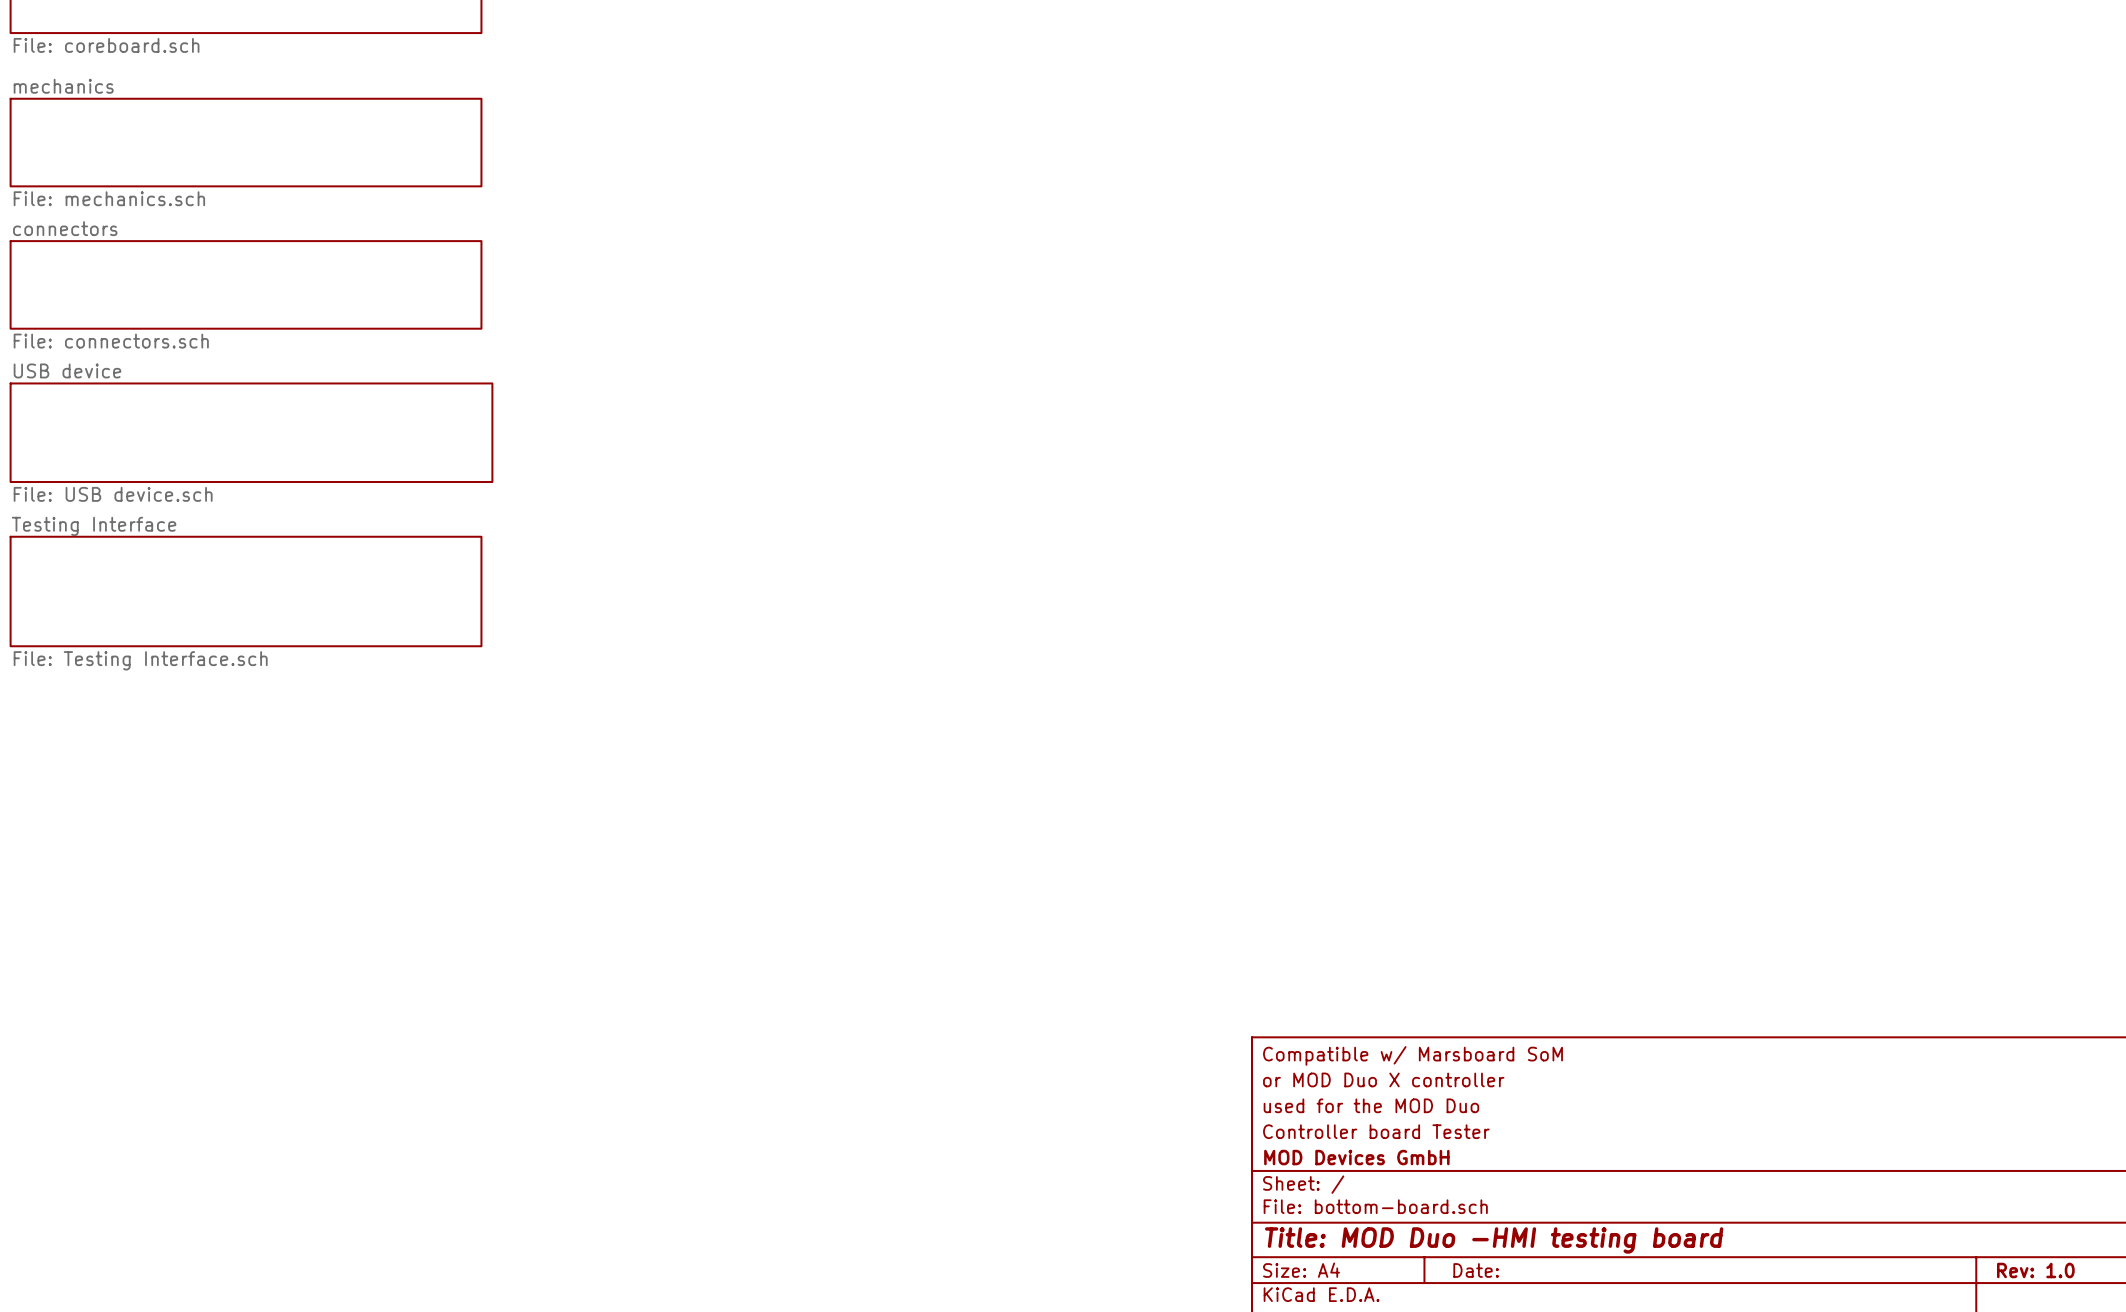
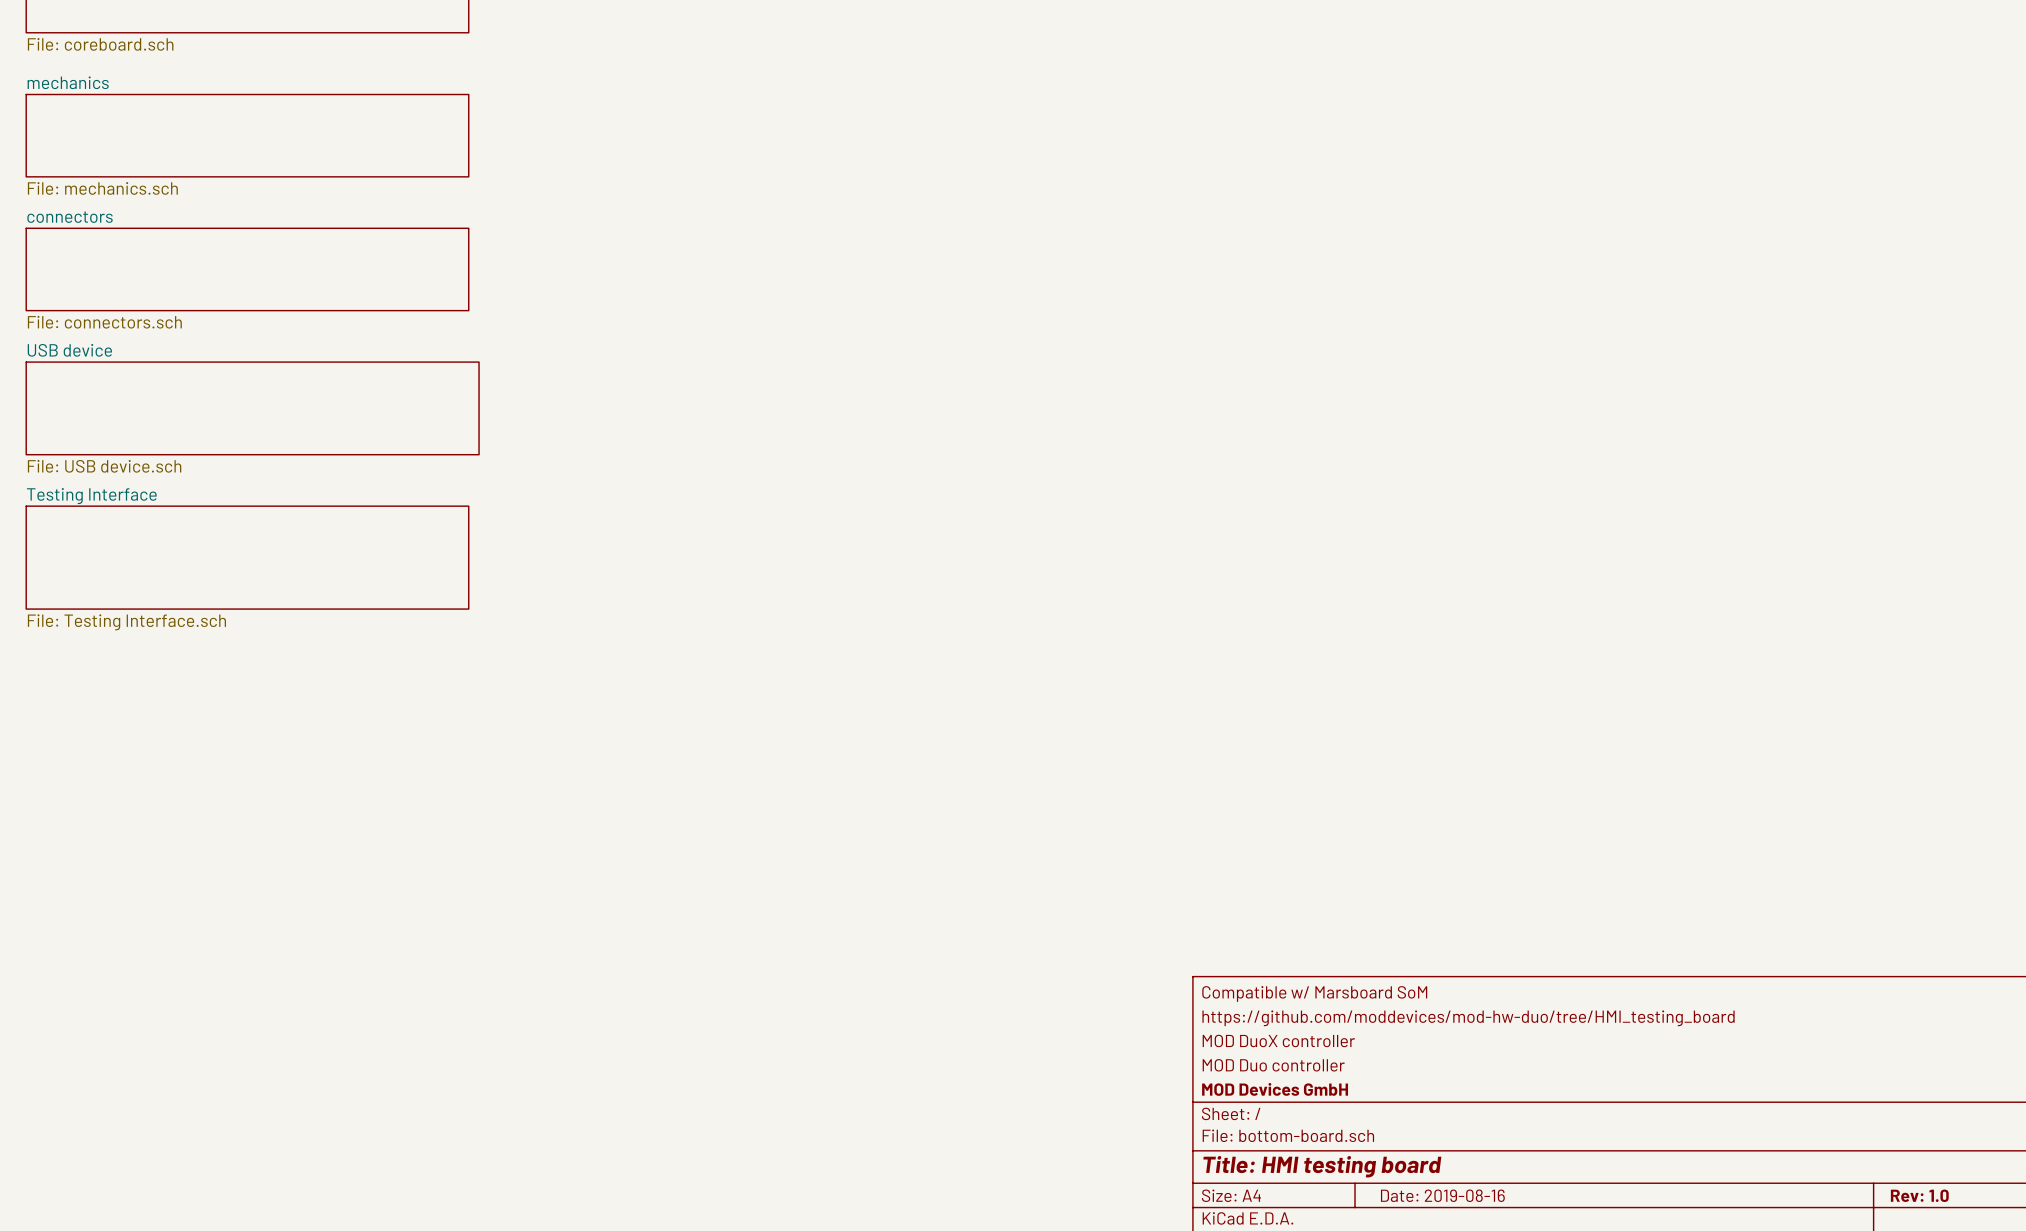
title block: or MOD Duo X controller (1383, 1079) -> https://github.com/moddevices/mod-hw-duo/tree/HMI_testing_board (1468, 1018)
title block: used for the MOD Duo (1371, 1105) -> MOD DuoX controller (1278, 1040)
title block: Controller board Tester (1376, 1131) -> MOD Duo controller (1273, 1065)
title block: Title: MOD Duo -HMI testing board (1494, 1240) -> Title: HMI testing board (1322, 1166)
title block: Date: (1476, 1270) -> Date: 2019-08-16 (1442, 1195)

